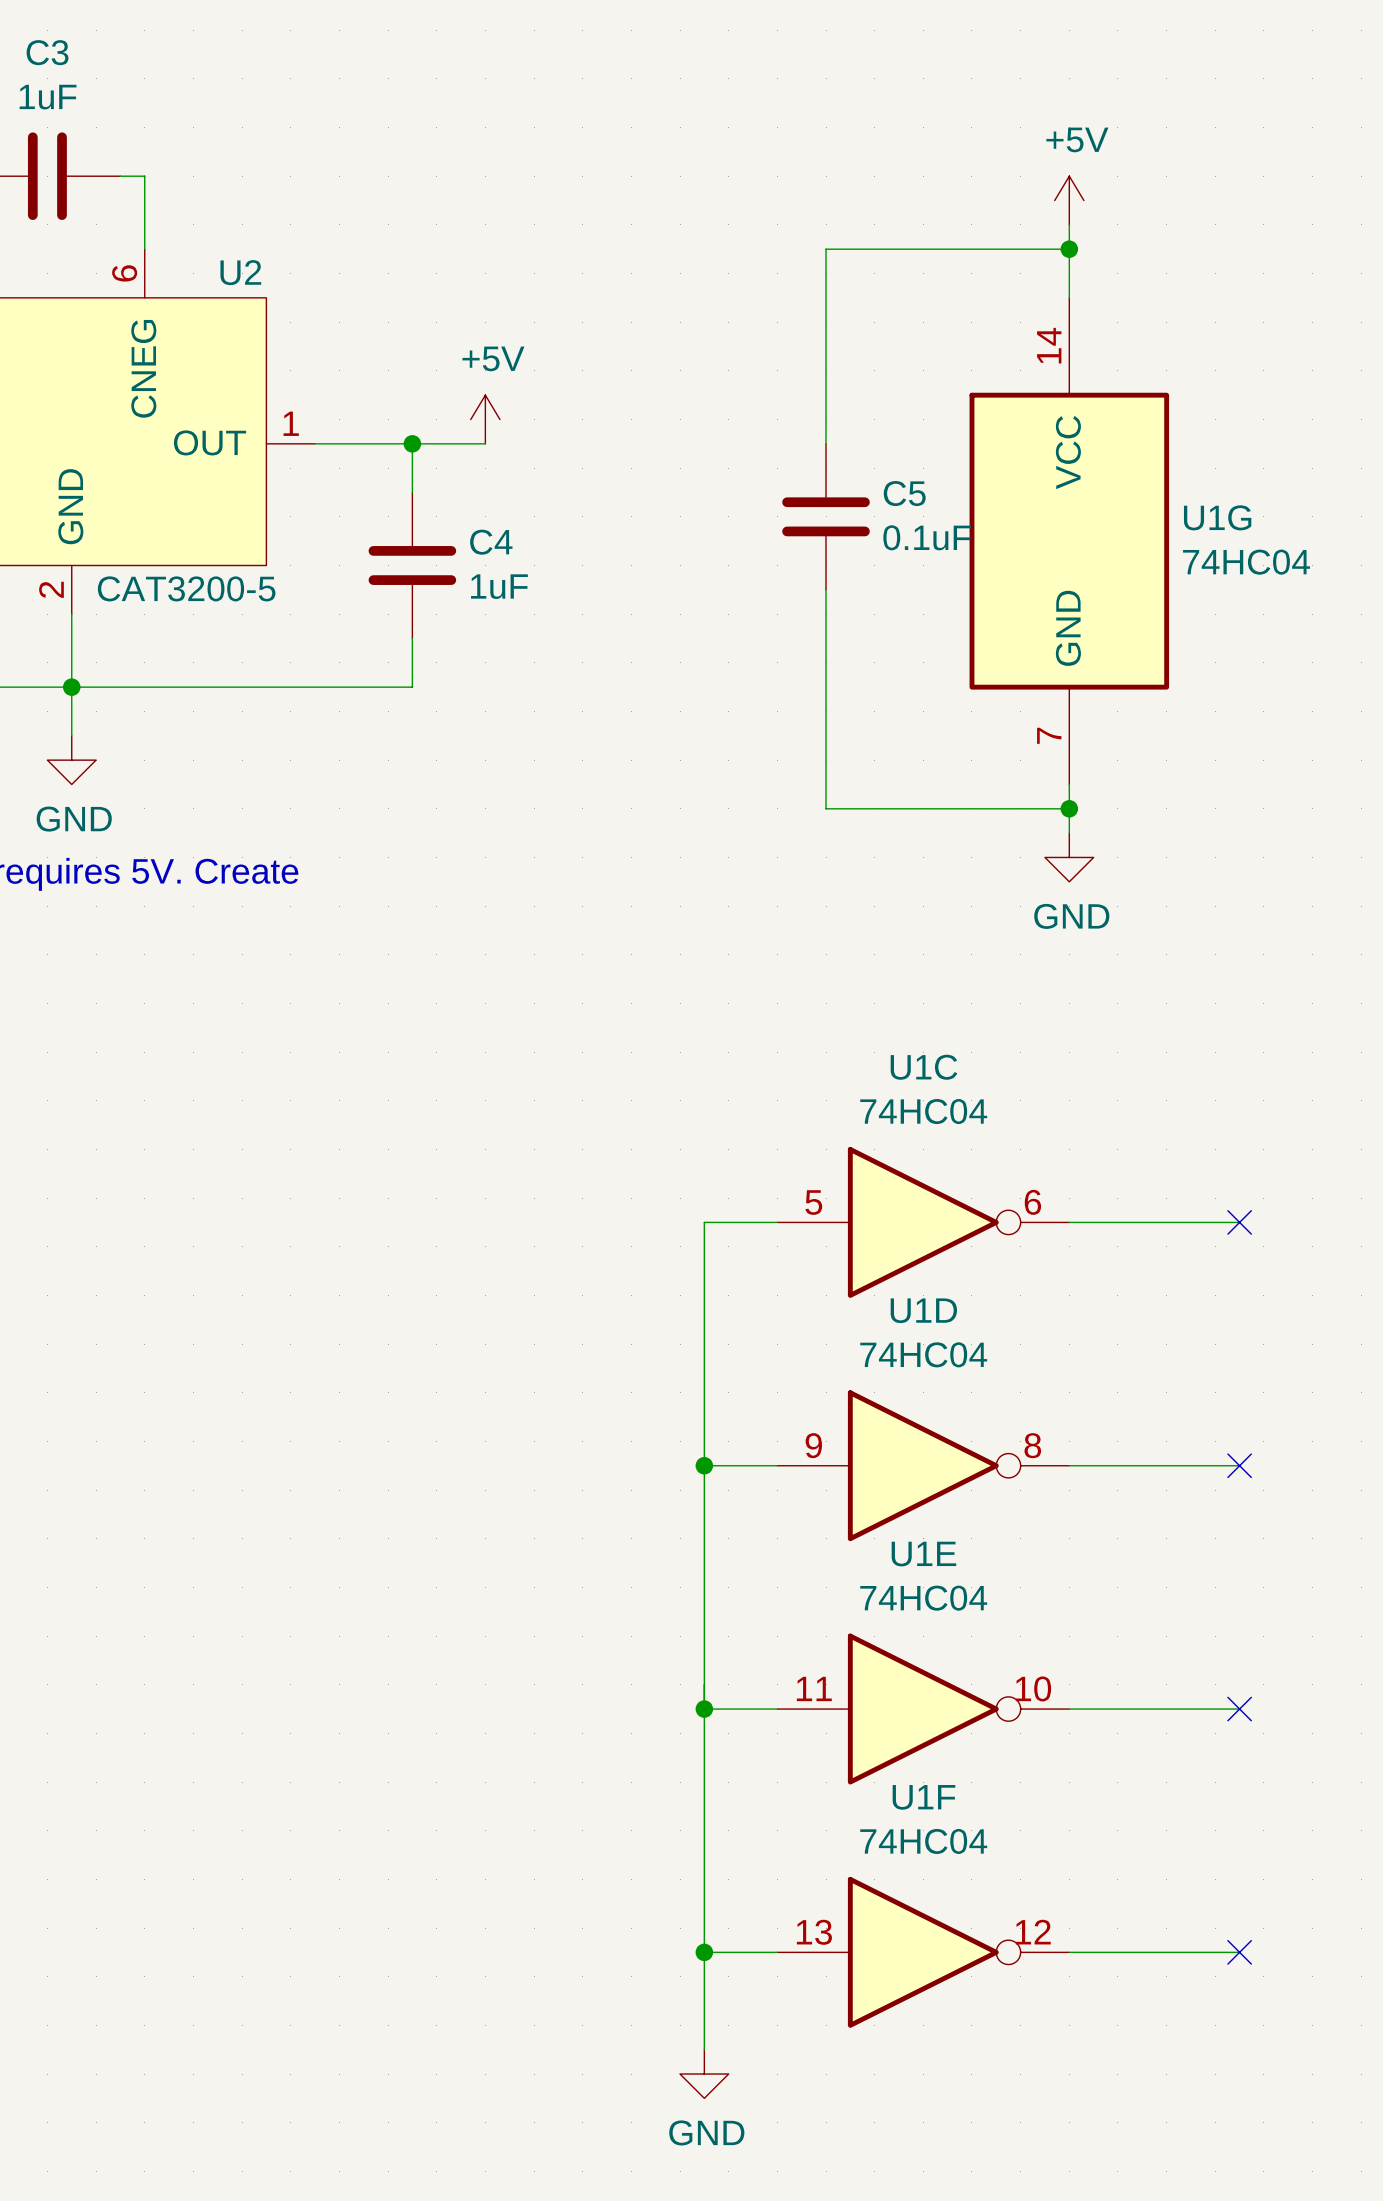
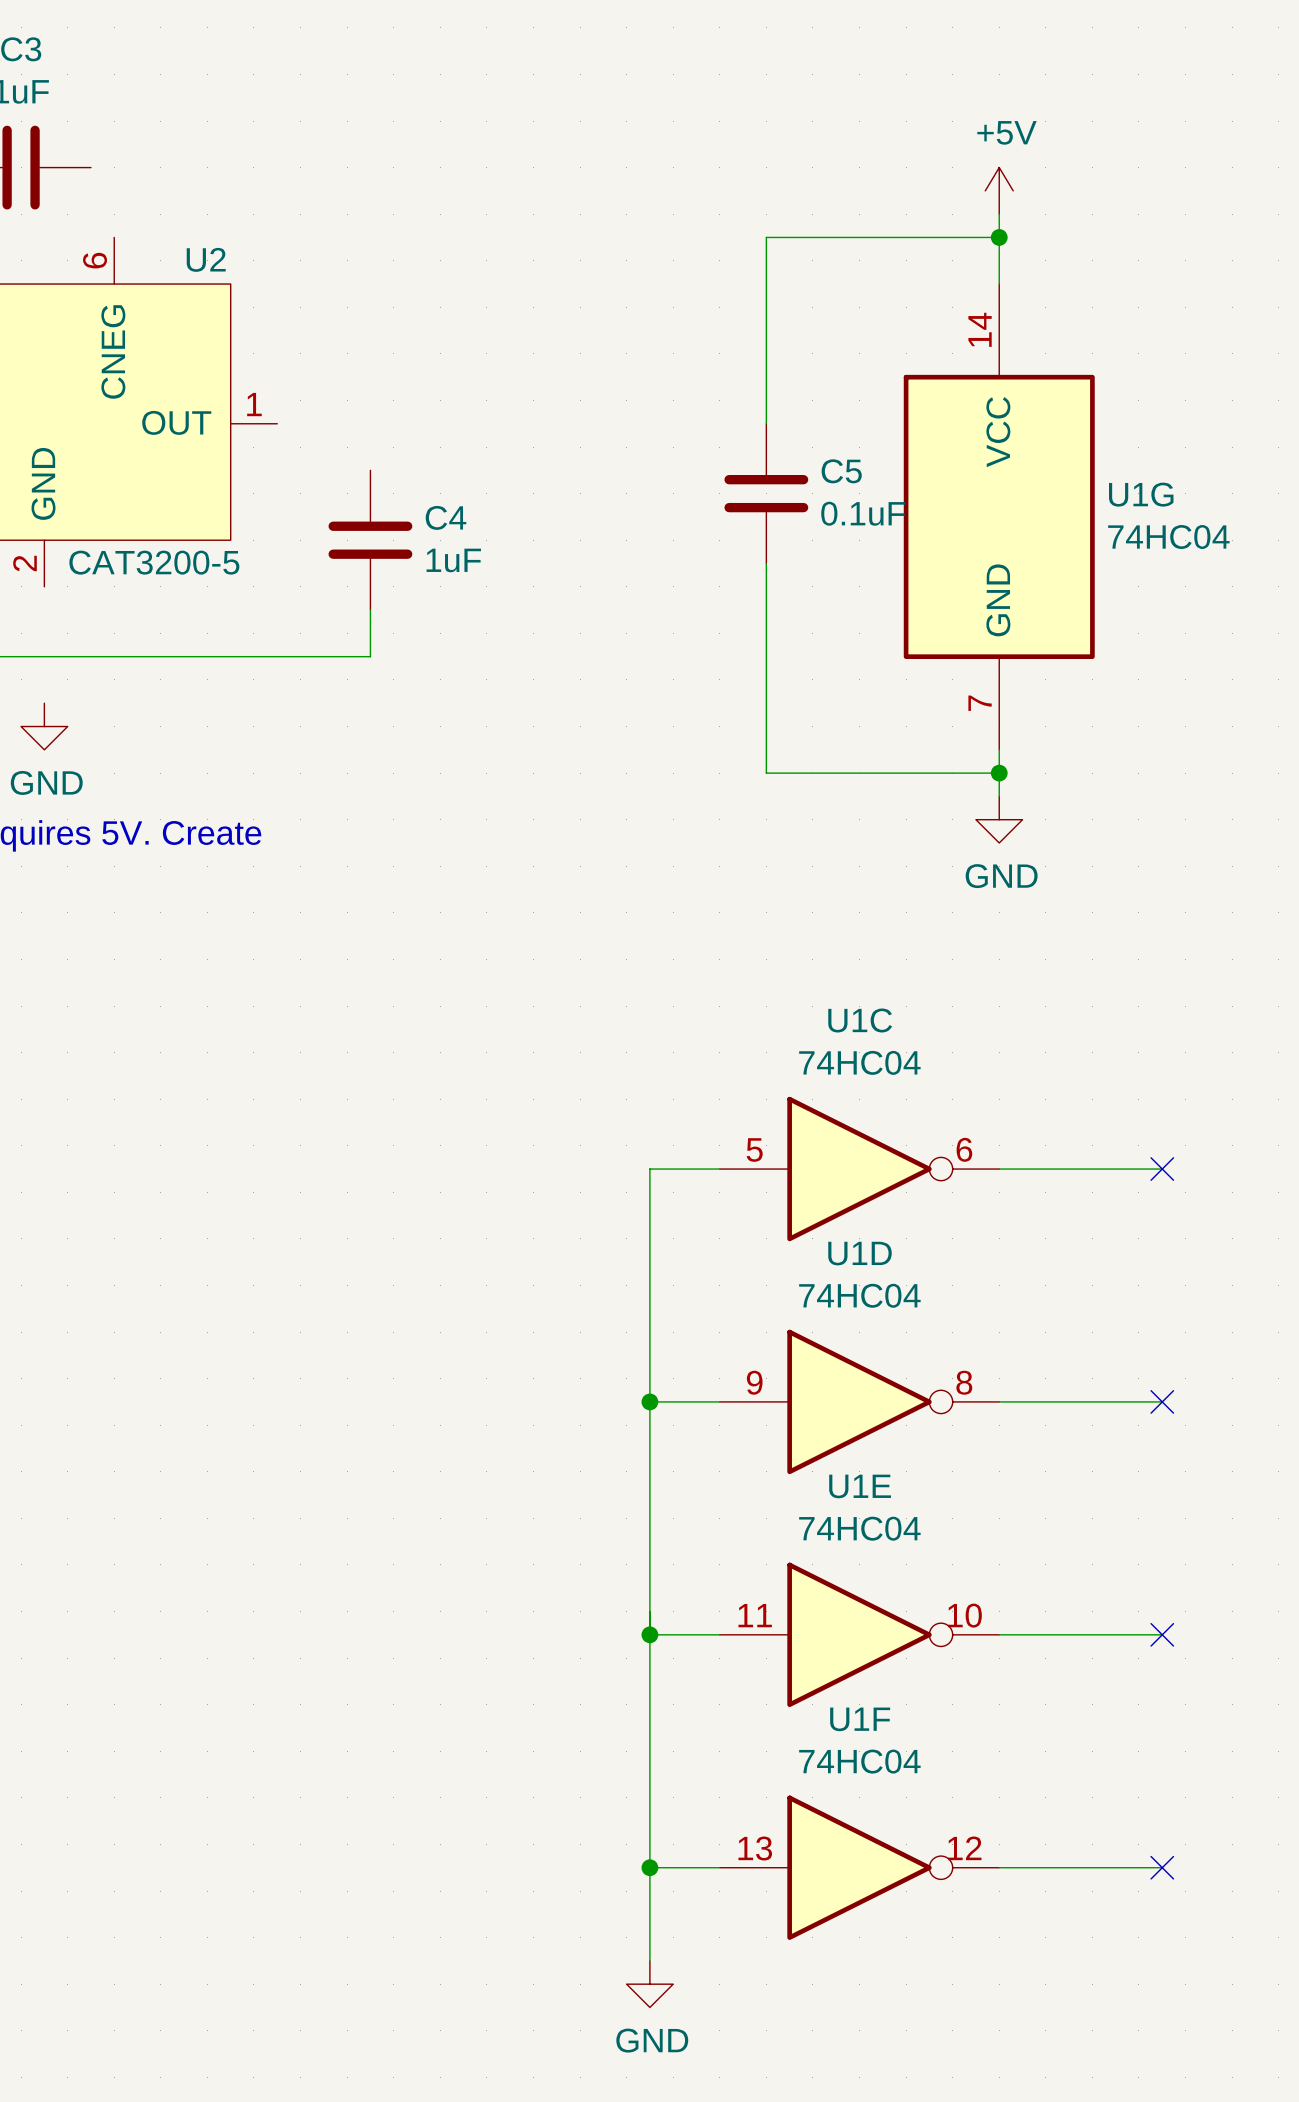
wire: (120, 176) (144, 176) (144, 249) -> none
power symbol: +5V (485, 419) -> none
wire: (315, 443) (485, 443) -> none
wire: (412, 443) (412, 492) -> none
junction: (412, 443) -> none
wire: (71, 614) (71, 735) -> none
junction: (71, 687) -> none

